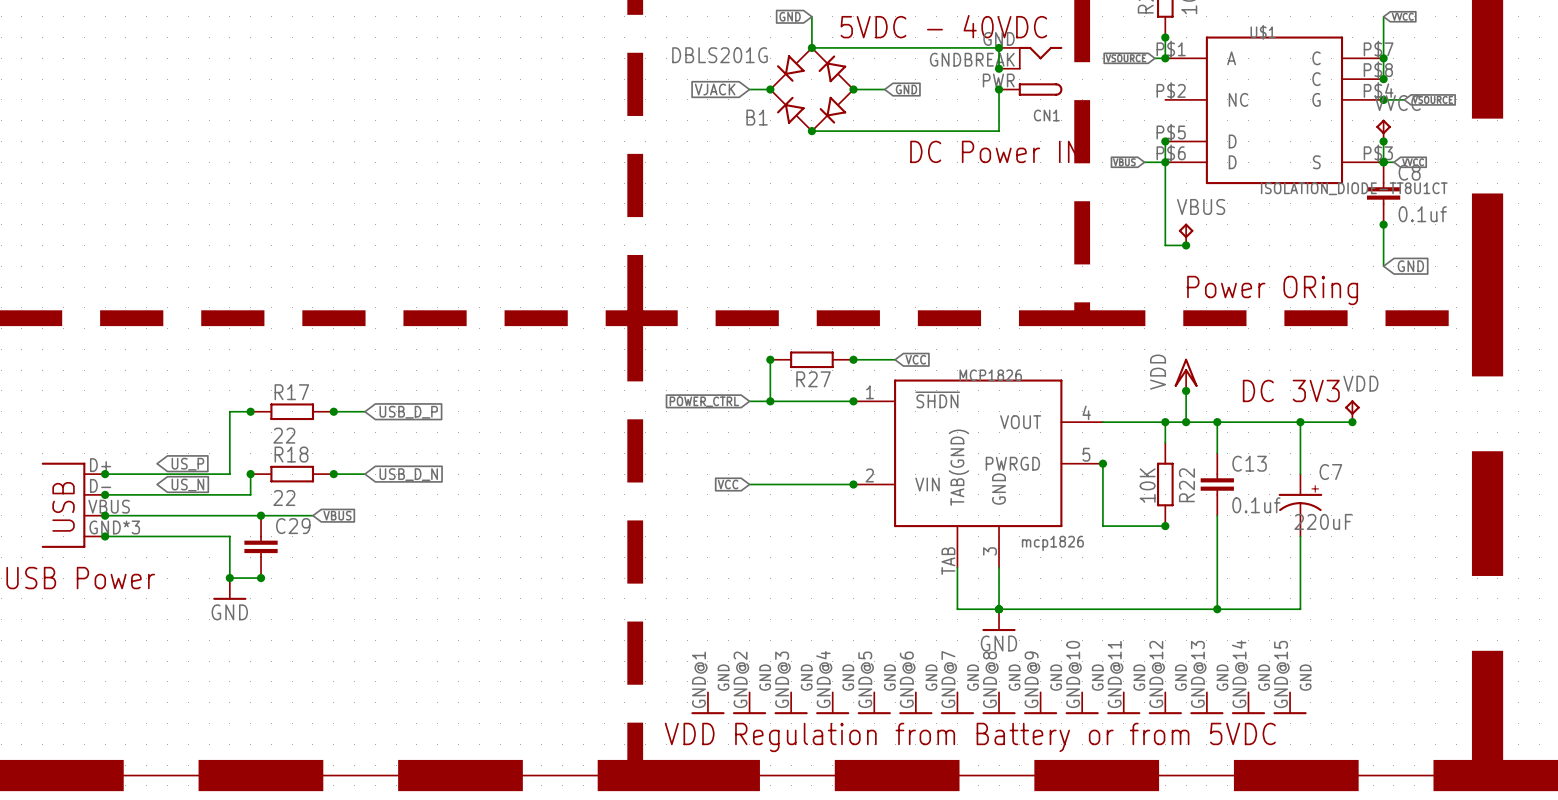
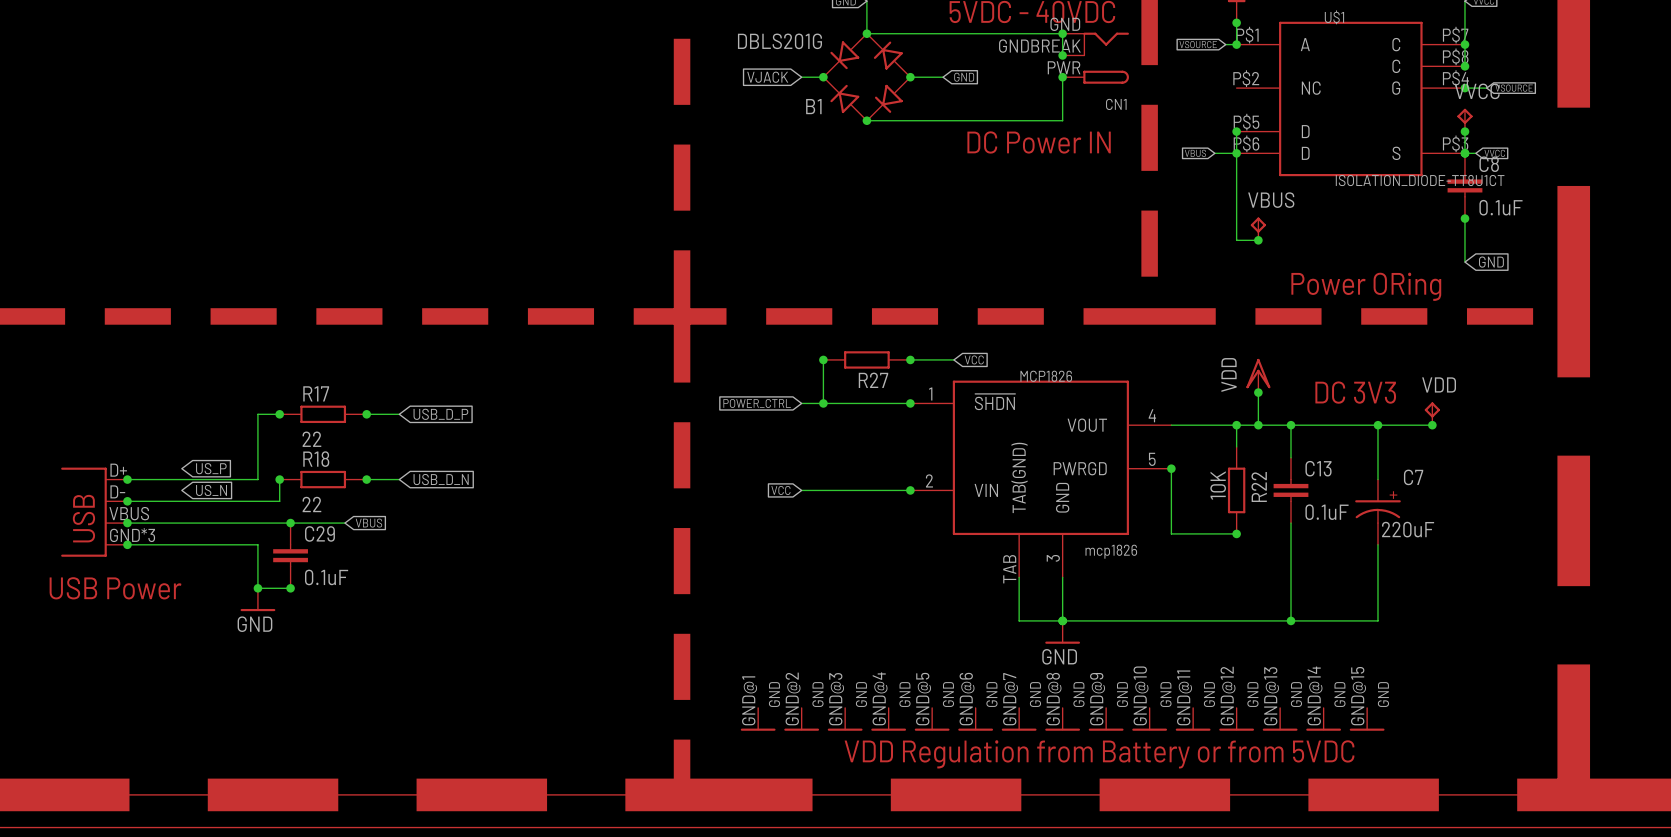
C8 value: 0.1uf (1422, 214) -> 0.1uF (1500, 207)
C13 value: 0.1uf (1256, 505) -> 0.1uF (1327, 512)
C29 value: none -> 0.1uF (326, 577)

